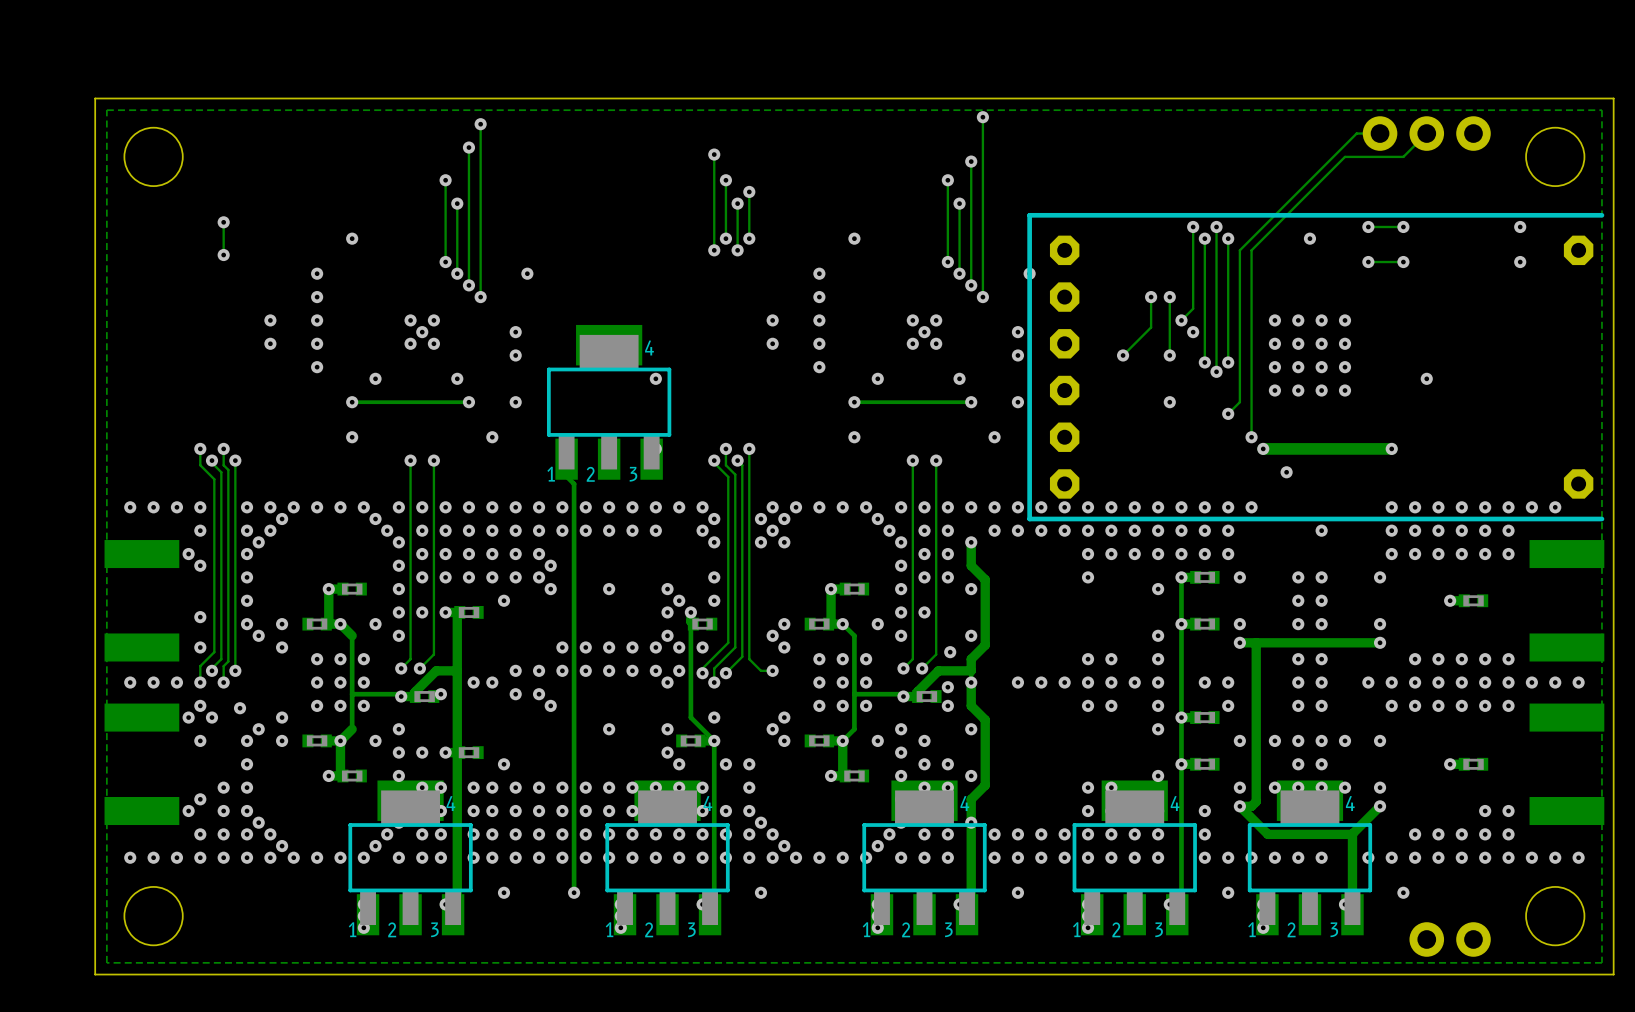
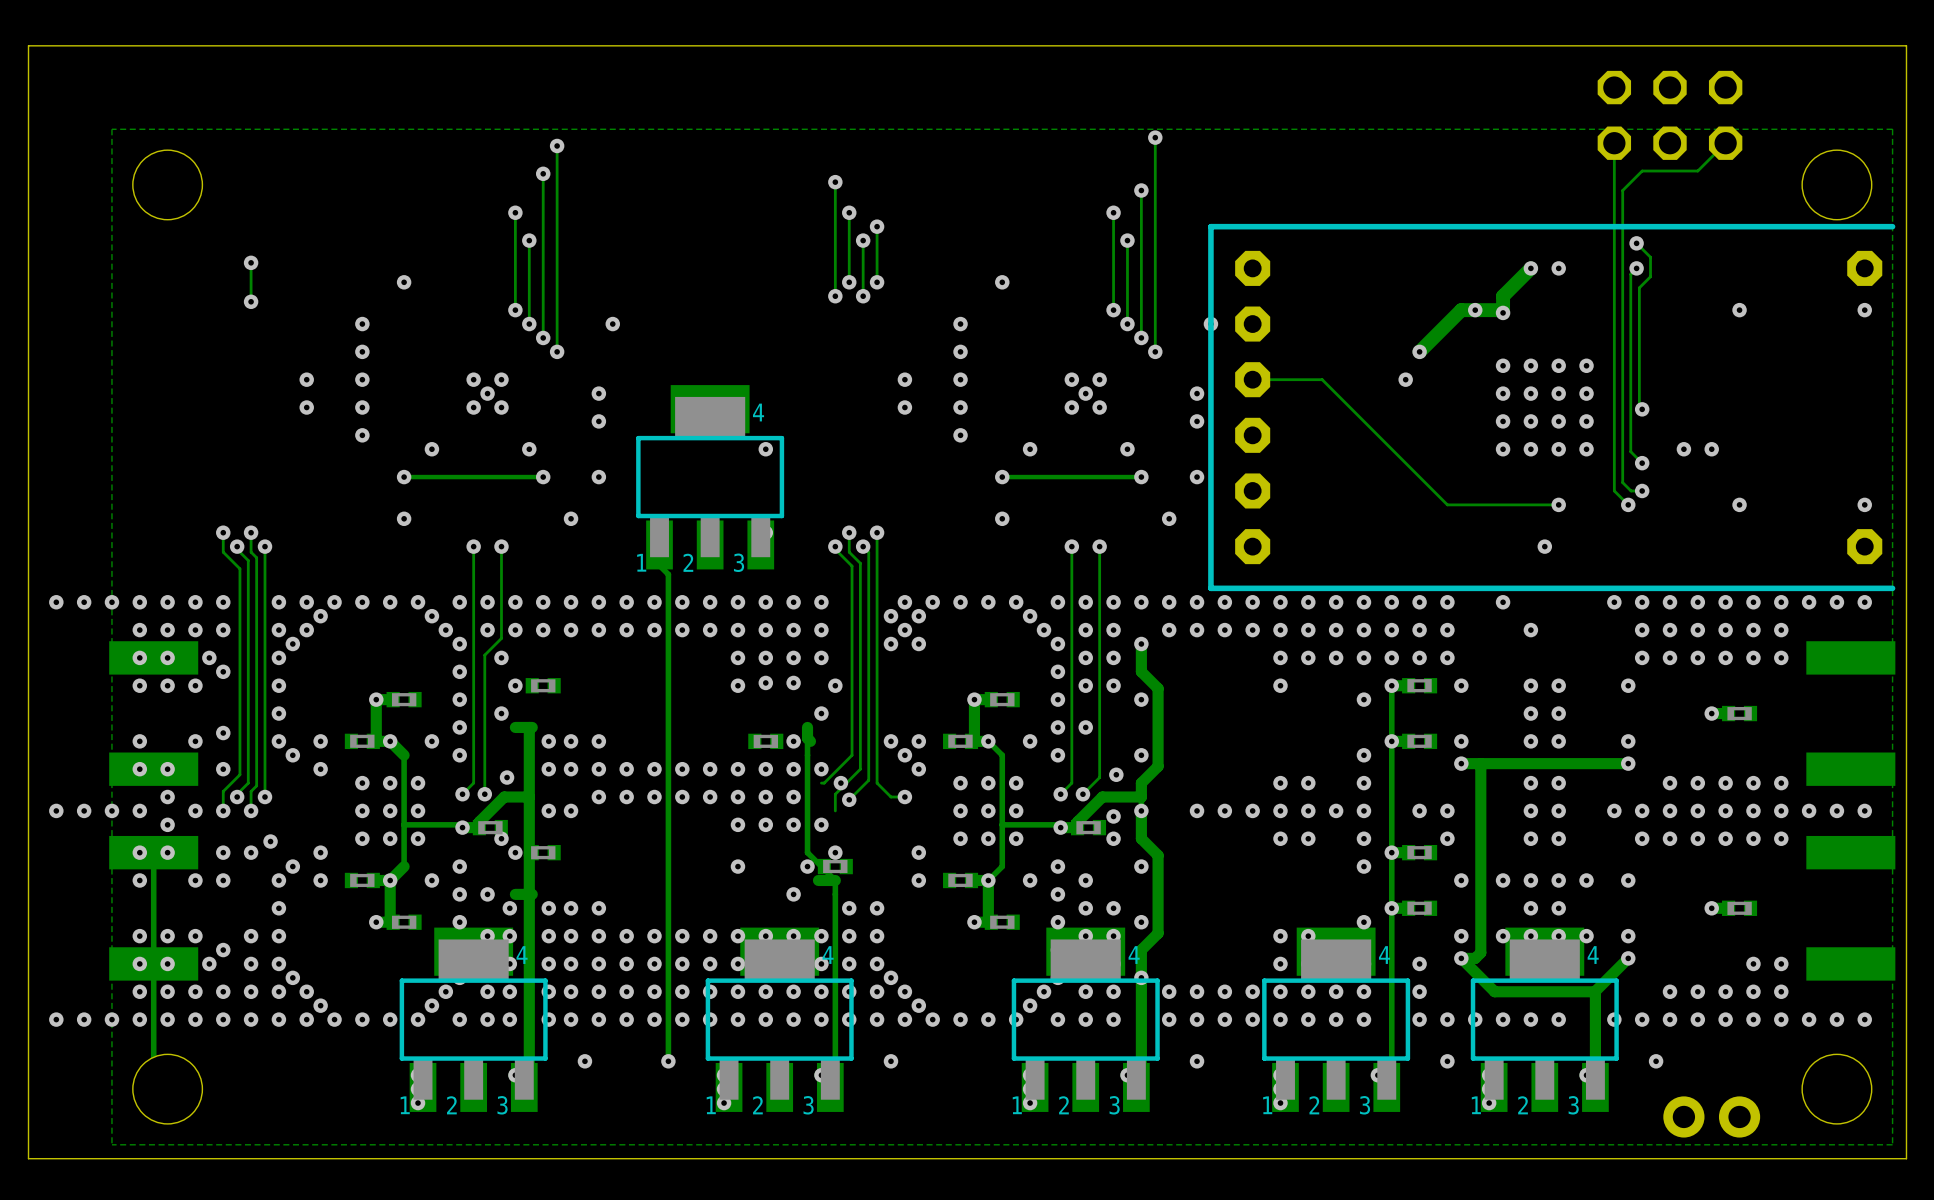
part: none -> (1669, 115)
board edge: (1613, 98) (95, 98) (95, 974) -> (1906, 115) (1906, 45) (28, 45) (28, 1158) (98, 1158)
track: none -> (1614, 143) (1614, 490) (1628, 504)
track: none -> (1725, 143) (1697, 171) (1642, 171) (1622, 190) (1622, 482) (1631, 490) (1642, 490)
track: (1380, 133) (1356, 133) (1239, 250) (1239, 402) (1228, 413) -> none
track: (1426, 133) (1403, 156) (1345, 156) (1251, 250) (1251, 437) -> none
part: (1426, 133) -> none
track: none -> (1636, 243) (1650, 257) (1650, 276) (1639, 287) (1639, 406) (1642, 409)
via: none -> (1636, 243)
line: (1601, 215) (1029, 215) -> (1892, 226) (1210, 226) (1210, 254)
part: none -> (1252, 268)
track: (1193, 226) (1193, 308) (1181, 320) -> none
via: (1193, 226) -> none
track: (1216, 226) (1216, 371) -> none
via: (1216, 226) -> none
track: none -> (1530, 268) (1503, 296) (1503, 312)
via: none -> (1530, 268)
via: none -> (1558, 268)
via: (1368, 226) -> none
track: none -> (1636, 268) (1630, 274) (1630, 451) (1642, 463)
via: none -> (1636, 268)
track: (1403, 226) (1368, 226) -> none
via: (1403, 226) -> none
via: (1520, 226) -> none
track: (1204, 238) (1204, 362) -> none
via: (1204, 238) -> none
track: (1228, 238) (1228, 362) -> none
via: (1228, 238) -> none
via: (1309, 238) -> none
part: (1064, 250) -> none
part position: (1578, 250) -> (1864, 268)
via: none -> (1475, 310)
track: none -> (1503, 310) (1461, 310) (1419, 351)
via: (1368, 262) -> none
track: (1403, 262) (1368, 262) -> none
via: (1403, 262) -> none
via: none -> (1739, 310)
via: (1520, 262) -> none
via: none -> (1864, 310)
via: none -> (1503, 312)
part: none -> (1252, 324)
part: (1064, 297) -> none
track: (1151, 297) (1151, 327) (1123, 355) -> none
via: (1151, 297) -> none
track: (1169, 297) (1169, 355) -> none
via: (1169, 297) -> none
via: none -> (1419, 351)
via: none -> (1503, 365)
via: none -> (1530, 365)
via: none -> (1558, 365)
via: none -> (1586, 365)
track: none -> (1252, 379) (1322, 379) (1447, 504) (1558, 504)
part: none -> (1252, 379)
via: (1181, 320) -> none
via: none -> (1405, 379)
via: (1274, 320) -> none
via: (1298, 320) -> none
via: (1321, 320) -> none
via: (1345, 320) -> none
via: (1193, 332) -> none
via: none -> (1503, 393)
via: none -> (1530, 393)
via: none -> (1558, 393)
via: none -> (1586, 393)
part: (1064, 343) -> none
via: (1274, 343) -> none
via: (1298, 343) -> none
via: (1321, 343) -> none
via: (1345, 343) -> none
via: none -> (1642, 409)
via: (1123, 355) -> none
via: (1169, 355) -> none
via: none -> (1503, 421)
via: none -> (1530, 421)
via: none -> (1558, 421)
via: none -> (1586, 421)
via: (1204, 362) -> none
via: (1228, 362) -> none
part: none -> (1252, 435)
via: (1274, 367) -> none
via: (1298, 367) -> none
via: (1321, 367) -> none
via: (1345, 367) -> none
via: (1216, 371) -> none
via: none -> (1503, 449)
via: none -> (1530, 449)
via: none -> (1558, 449)
via: none -> (1586, 449)
via: none -> (1711, 449)
part: (1064, 390) -> none
via: (1274, 390) -> none
via: (1298, 390) -> none
via: (1321, 390) -> none
via: (1345, 390) -> none
via: none -> (1642, 463)
via: (1169, 402) -> none
part: none -> (1252, 490)
via: (1228, 413) -> none
via: none -> (1642, 490)
via: none -> (1558, 504)
via: none -> (1628, 504)
via: none -> (1739, 504)
via: none -> (1864, 504)
part: (1064, 437) -> none
via: (1251, 437) -> none
via: (1263, 448) -> none
track: (1391, 448) (1263, 448) -> none
via: (1391, 448) -> none
part: none -> (1252, 546)
via: none -> (1544, 546)
via: (1286, 472) -> none
part: (1064, 483) -> none
part position: (1578, 483) -> (1864, 546)
line: (1029, 495) (1029, 518) (1601, 518) -> (1210, 588) (1892, 588)
via: none -> (56, 602)
via: none -> (84, 602)
via: none -> (111, 602)
via: (1251, 507) -> none
via: none -> (1503, 602)
via: none -> (1614, 602)
via: none -> (1864, 602)
via: (714, 518) -> none
via: none -> (139, 630)
via: none -> (167, 630)
via: none -> (195, 630)
via: none -> (793, 630)
via position: (1321, 530) -> (1530, 630)
track: (433, 537) (433, 654) (419, 668) -> (501, 638) (484, 655) (484, 794)
via position: (714, 542) -> (821, 657)
via: none -> (139, 657)
via: none -> (167, 657)
via: (422, 554) -> none
via: none -> (501, 657)
via: (445, 554) -> none
via: (468, 554) -> none
via: (492, 554) -> none
via: (515, 554) -> none
via: (539, 554) -> none
via: none -> (737, 657)
via: none -> (765, 657)
via: none -> (793, 657)
via: (550, 565) -> none
via: none -> (765, 682)
via: none -> (793, 682)
via: none -> (139, 685)
via: none -> (167, 685)
via: none -> (195, 685)
via: (422, 577) -> none
via: (468, 577) -> none
via: (492, 577) -> none
via: (515, 577) -> none
via: (539, 577) -> none
via: none -> (737, 685)
via: (550, 589) -> none
via: (609, 589) -> none
via: (667, 589) -> none
via: none -> (501, 713)
via: (504, 600) -> none
via: (679, 600) -> none
via: none -> (821, 713)
via: (714, 600) -> none
via: (422, 612) -> none
via: (445, 612) -> none
part position: (468, 612) -> (543, 685)
via: (667, 612) -> none
via: (690, 612) -> none
via: none -> (139, 741)
via: none -> (195, 741)
via: none -> (548, 741)
via: none -> (571, 741)
via: none -> (598, 741)
via: none -> (793, 741)
part position: (702, 624) -> (765, 741)
via: none -> (890, 741)
via: (667, 635) -> none
track: (728, 635) (728, 642) (702, 668) (702, 673) -> (852, 755) (824, 783) (821, 783)
via: none -> (139, 769)
via: none -> (167, 769)
via: none -> (548, 769)
via: none -> (571, 769)
via: none -> (598, 769)
via: none -> (626, 769)
via: none -> (507, 777)
via: none -> (840, 783)
via: none -> (167, 797)
via: (702, 673) -> none
via: none -> (56, 810)
via: none -> (84, 810)
via: none -> (111, 810)
via: (153, 682) -> none
via: (667, 682) -> none
via position: (714, 682) -> (821, 824)
via: none -> (167, 824)
via position: (440, 694) -> (501, 838)
via: (515, 694) -> none
via: (539, 694) -> none
via: none -> (737, 824)
via: none -> (765, 824)
via: none -> (793, 824)
via: (200, 705) -> none
via: (550, 705) -> none
via: none -> (139, 852)
track: none -> (167, 852) (153, 866) (153, 1061)
via: none -> (167, 852)
via: (188, 717) -> none
via: none -> (223, 852)
via: (211, 717) -> none
via: none -> (251, 852)
via: none -> (515, 852)
via: (609, 729) -> none
via: none -> (737, 866)
via: (667, 729) -> none
via: none -> (807, 866)
via: (772, 729) -> none
via: none -> (139, 880)
via: none -> (195, 880)
part position: (690, 740) -> (835, 866)
via: (714, 740) -> none
via position: (445, 752) -> (509, 908)
part position: (468, 752) -> (543, 852)
via: (667, 752) -> none
via: none -> (793, 894)
via: none -> (548, 908)
via: none -> (571, 908)
via: (504, 764) -> none
via: none -> (598, 908)
via: (679, 764) -> none
via: none -> (139, 936)
via: none -> (167, 936)
via: none -> (195, 936)
via: none -> (849, 936)
via: none -> (139, 963)
via: none -> (167, 963)
via: none -> (139, 991)
via: none -> (167, 991)
via: none -> (195, 991)
via: none -> (56, 1019)
via: none -> (84, 1019)
via: none -> (111, 1019)

